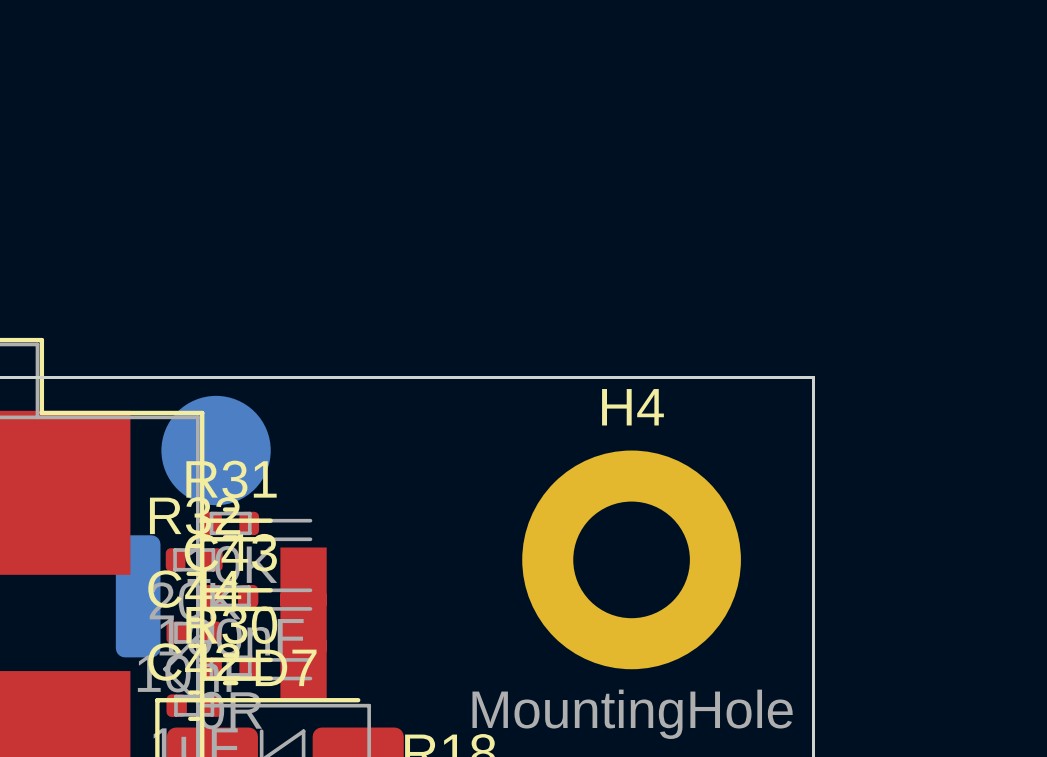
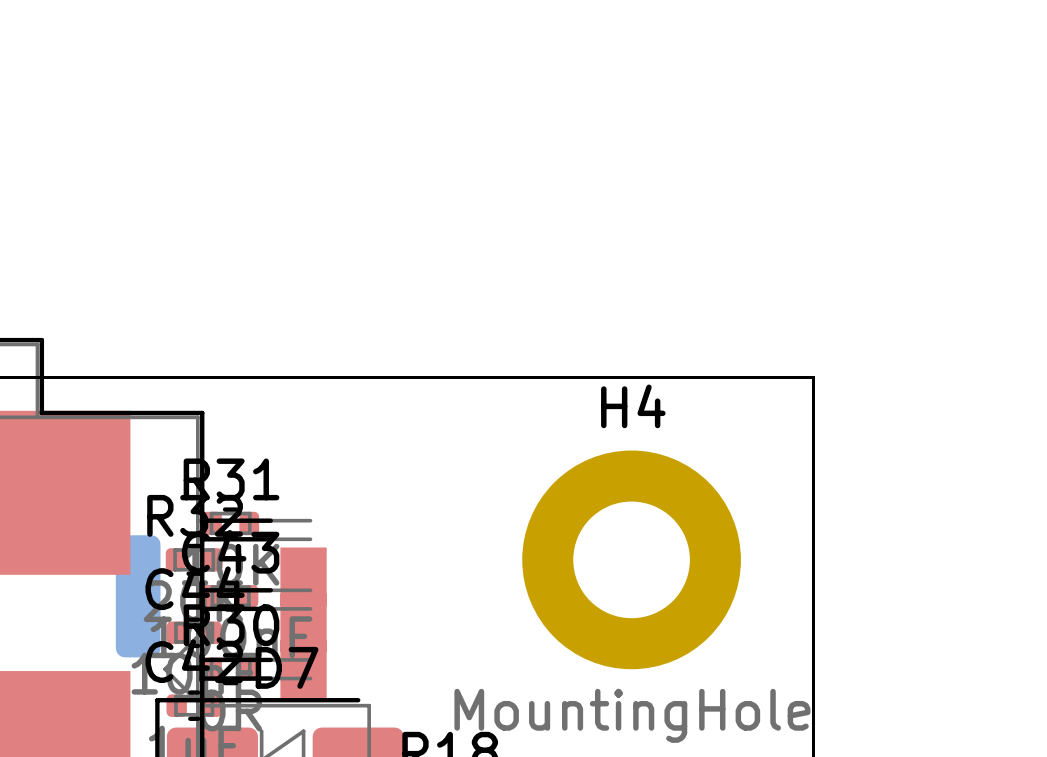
part: (216, 450) -> none

